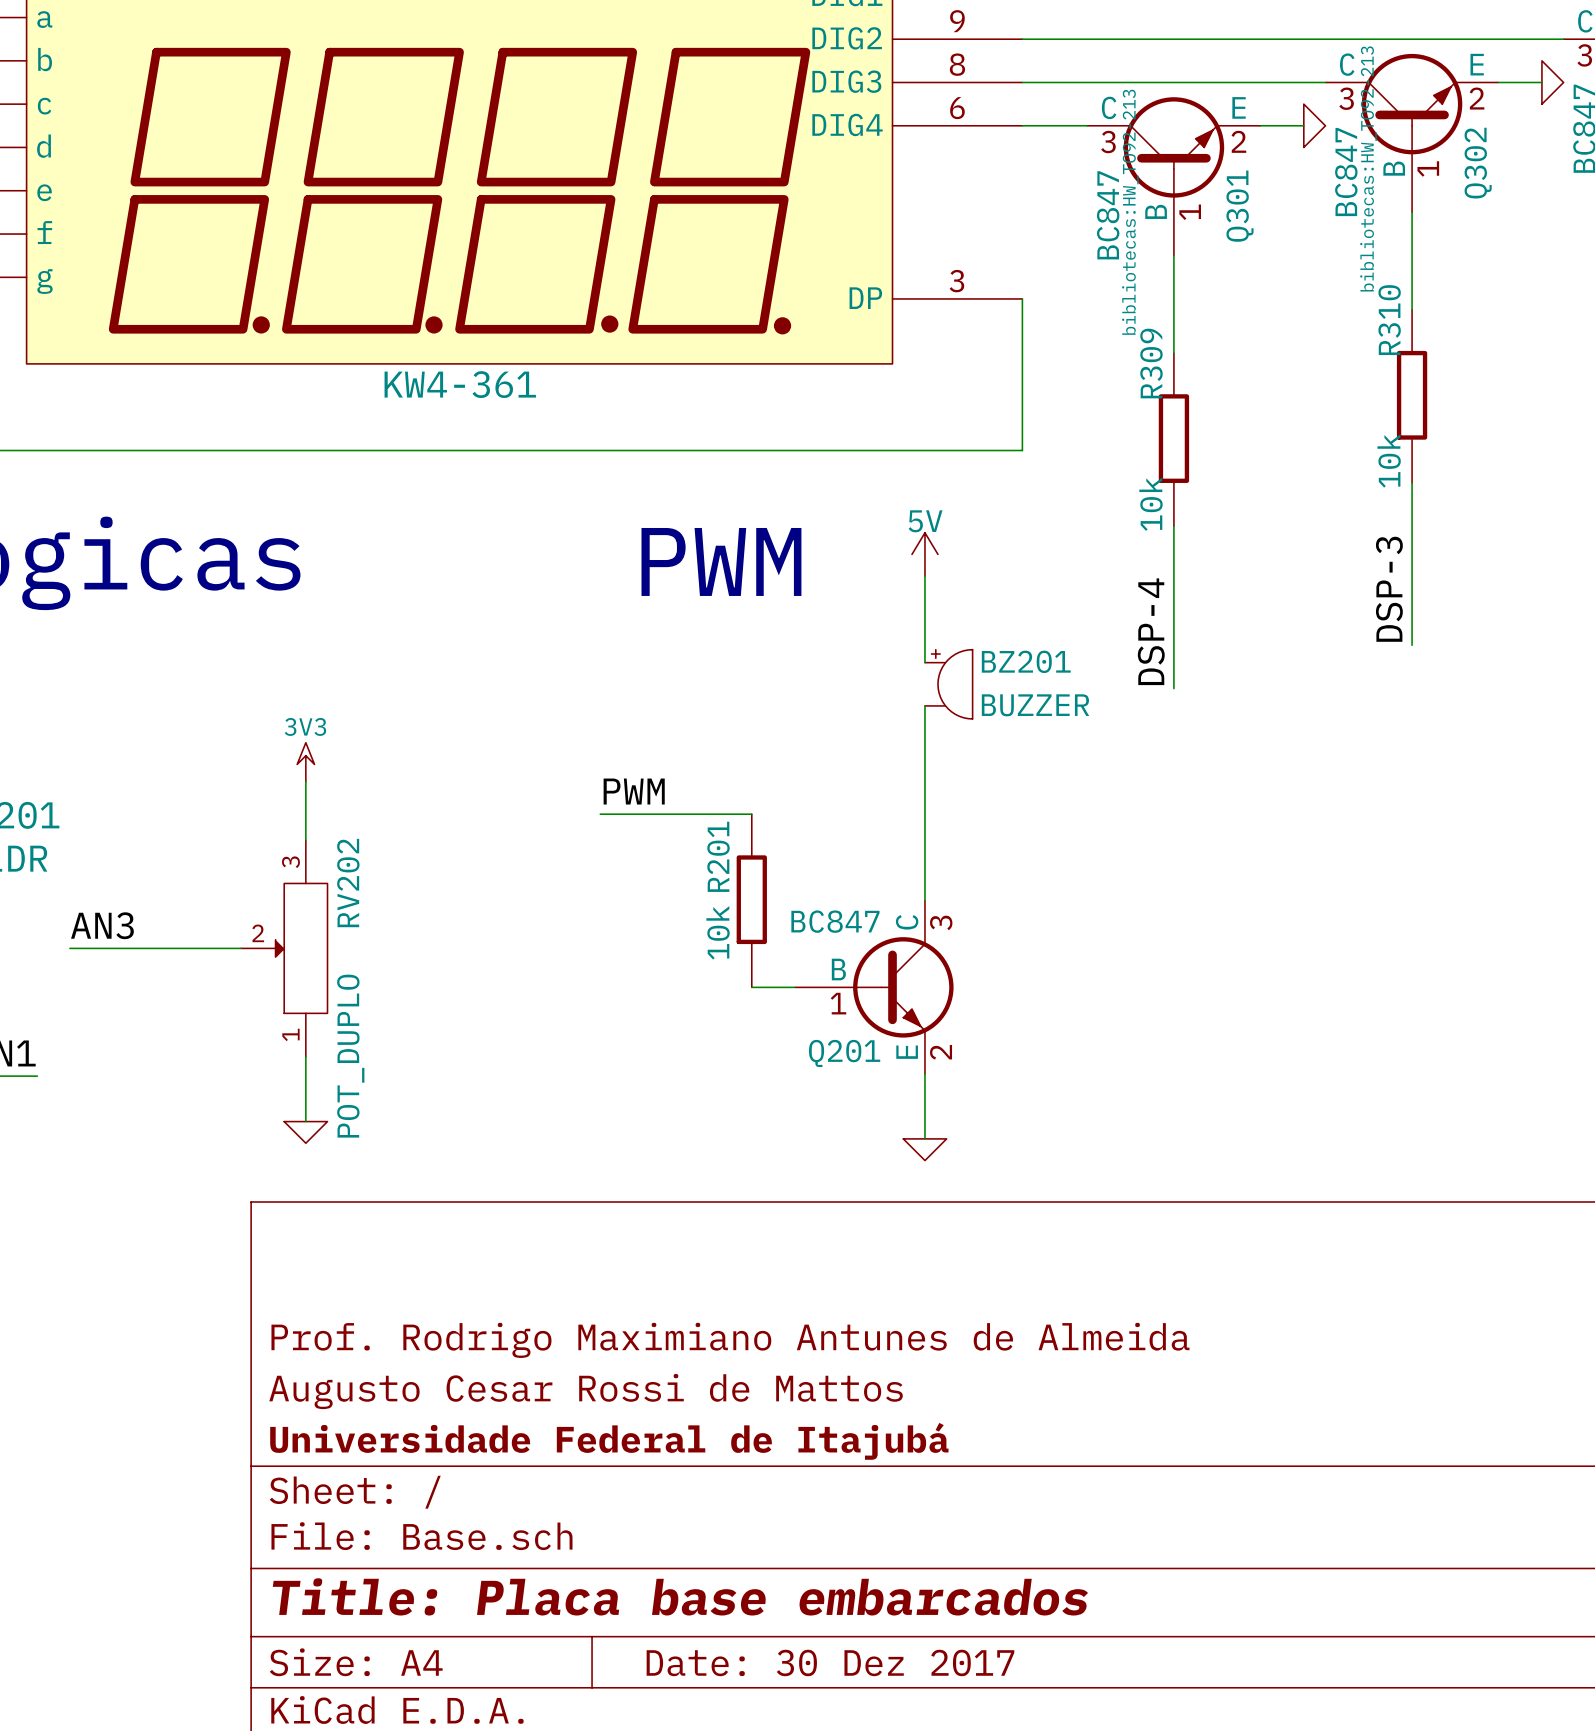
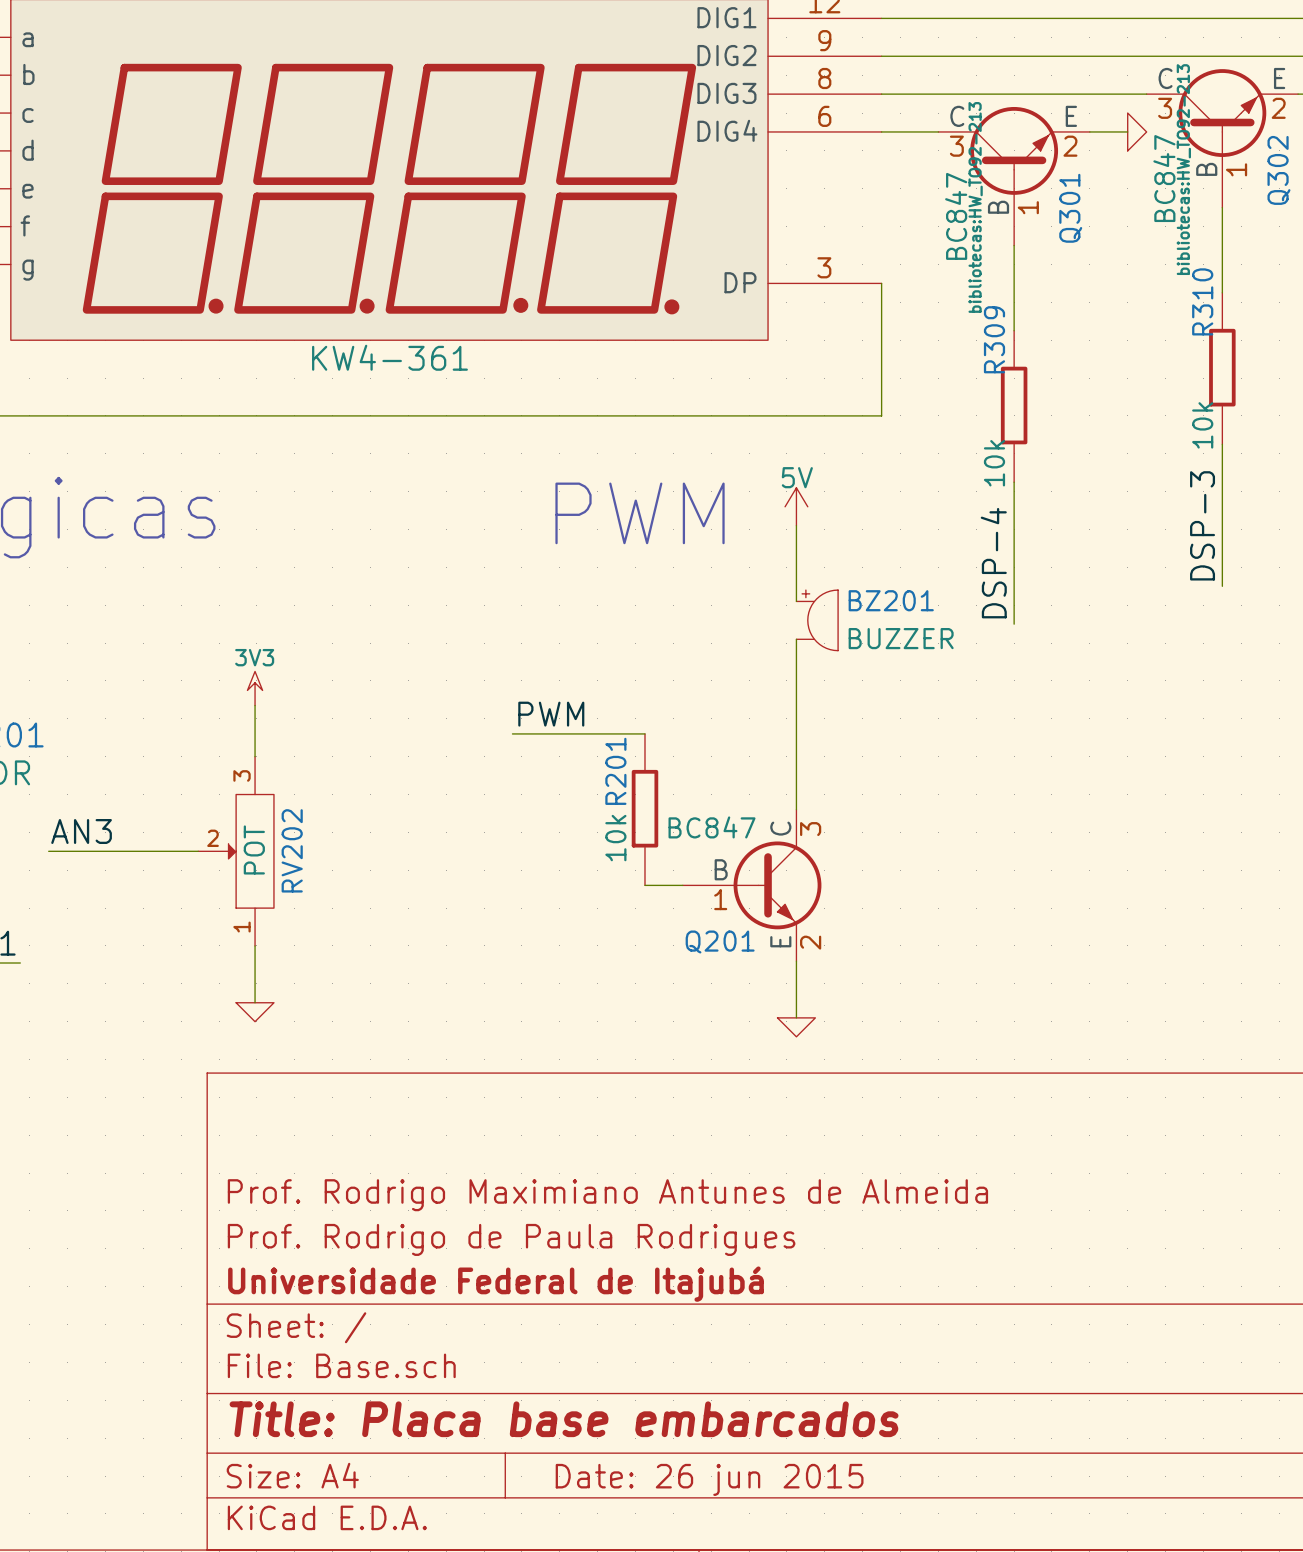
RV202 name position: RV202 (348, 883) -> RV202 (292, 850)
RV202 value: POT_DUPLO (350, 1056) -> POT (254, 849)
title block: Augusto Cesar Rossi de Mattos (586, 1391) -> Prof. Rodrigo de Paula Rodrigues (511, 1239)
title block: Date: 30 Dez 2017 (830, 1662) -> Date: 26 jun 2015 (709, 1479)

